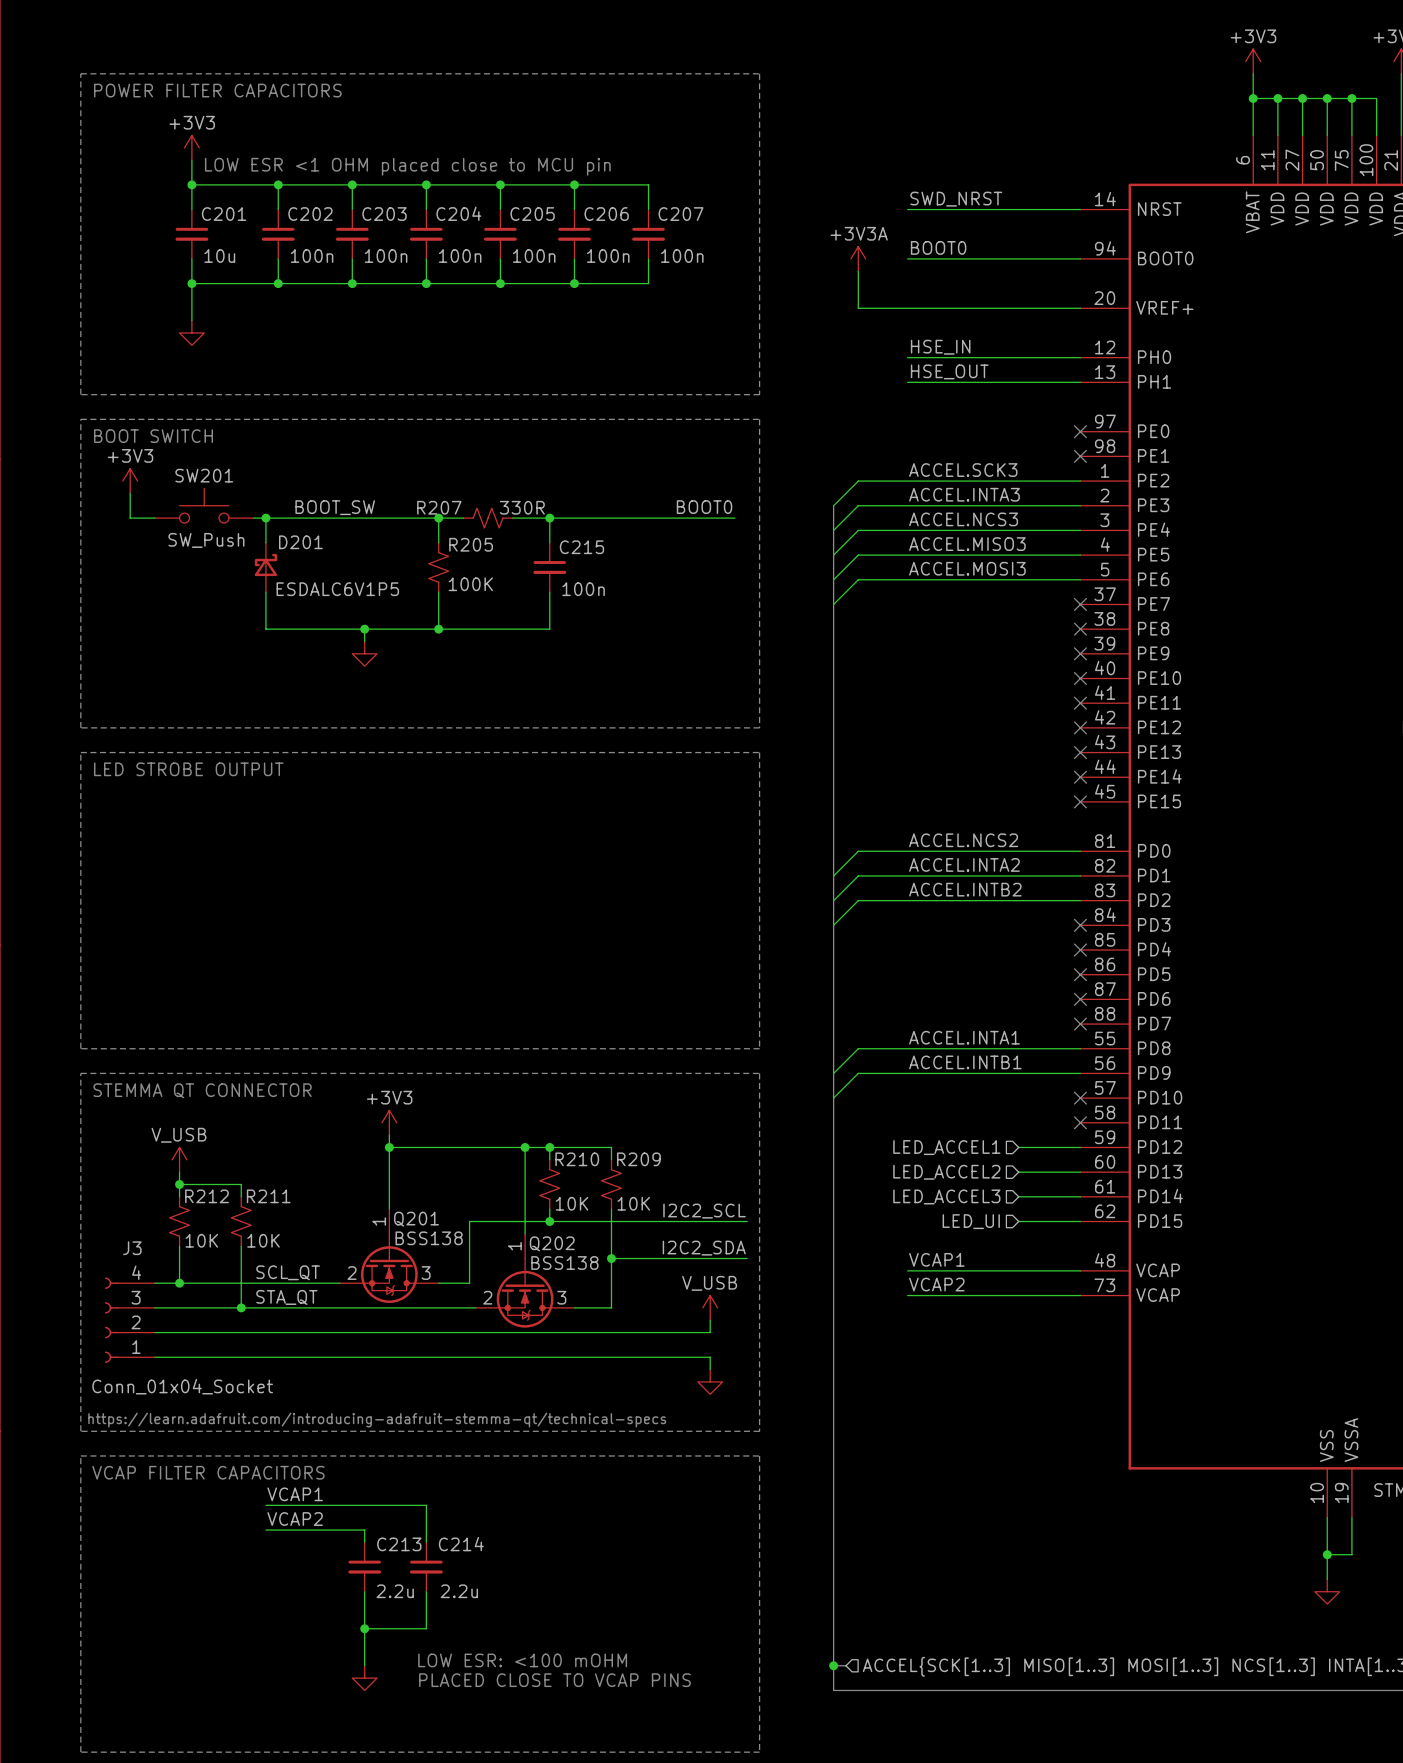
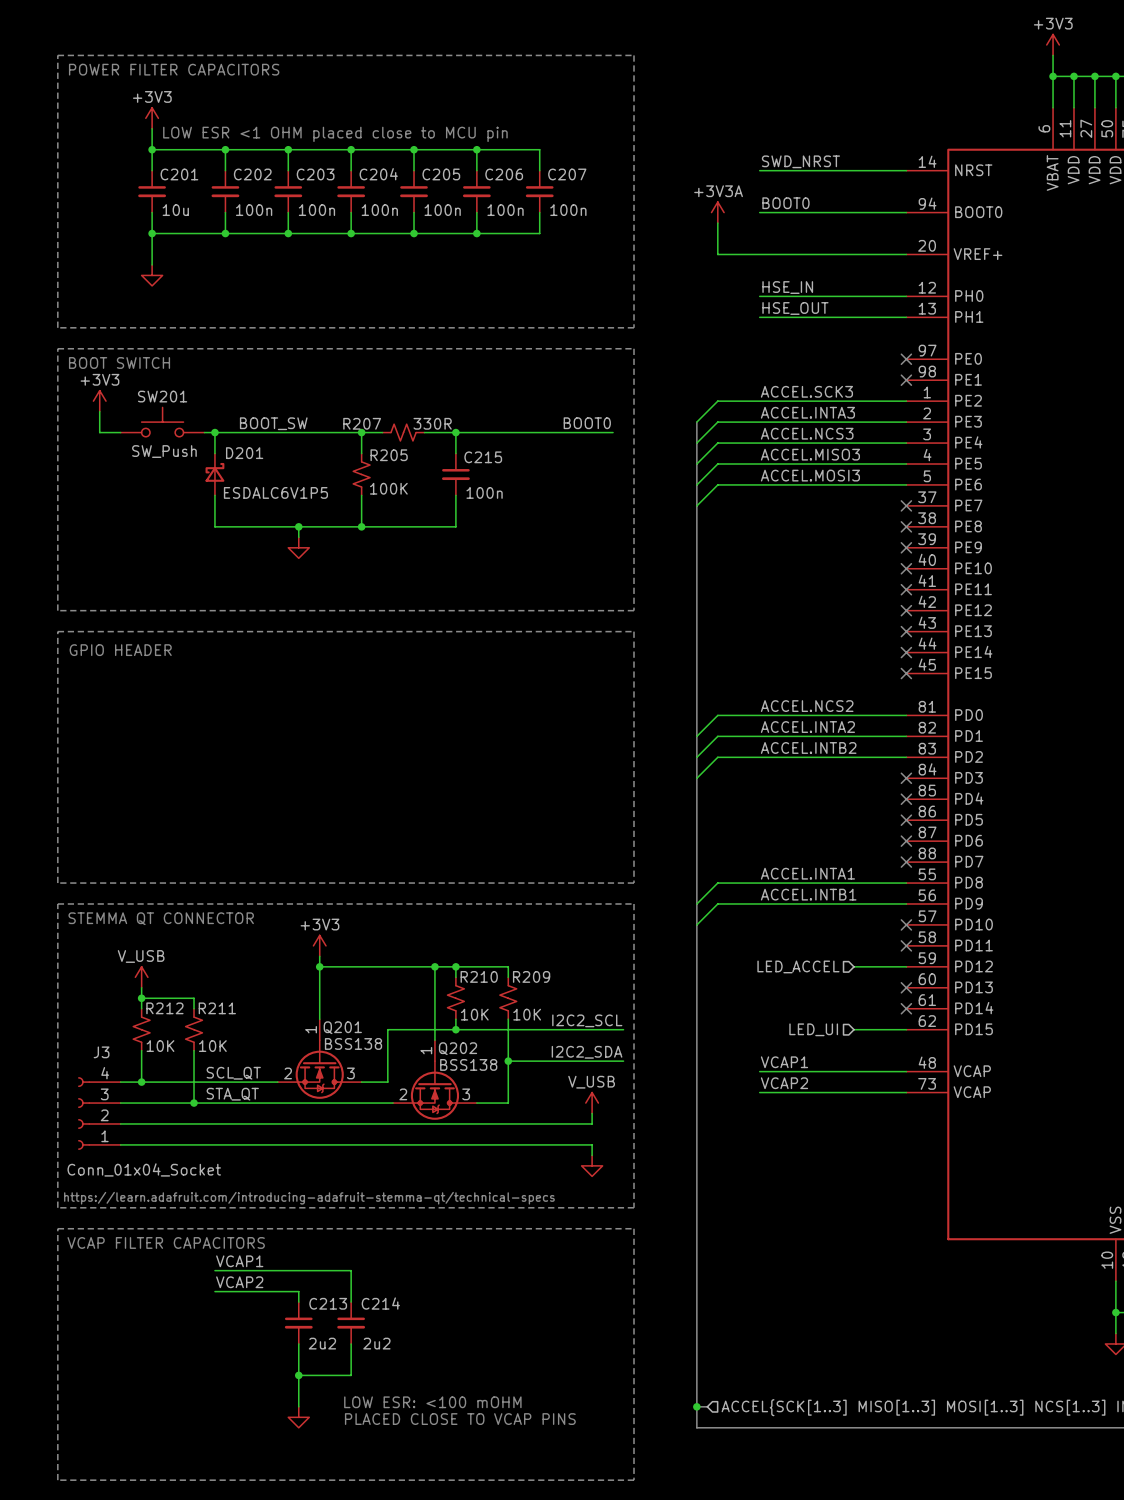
text: LED STROBE OUTPUT (188, 769) -> none
text: none -> GPIO HEADER (120, 650)
hierarchical label: LED_ACCEL1 (946, 1147) -> LED_ACCEL (798, 966)
hierarchical label: LED_ACCEL2 (946, 1172) -> none
wire: (1018, 1172) (1080, 1172) -> none
no-connect mark: none -> (906, 987)
hierarchical label: LED_ACCEL3 (946, 1196) -> none
wire: (1018, 1196) (1080, 1196) -> none
no-connect mark: none -> (906, 1008)
C213 value: 2.2u (395, 1591) -> 2u2 (322, 1343)
C214 value: 2.2u (459, 1591) -> 2u2 (376, 1343)

